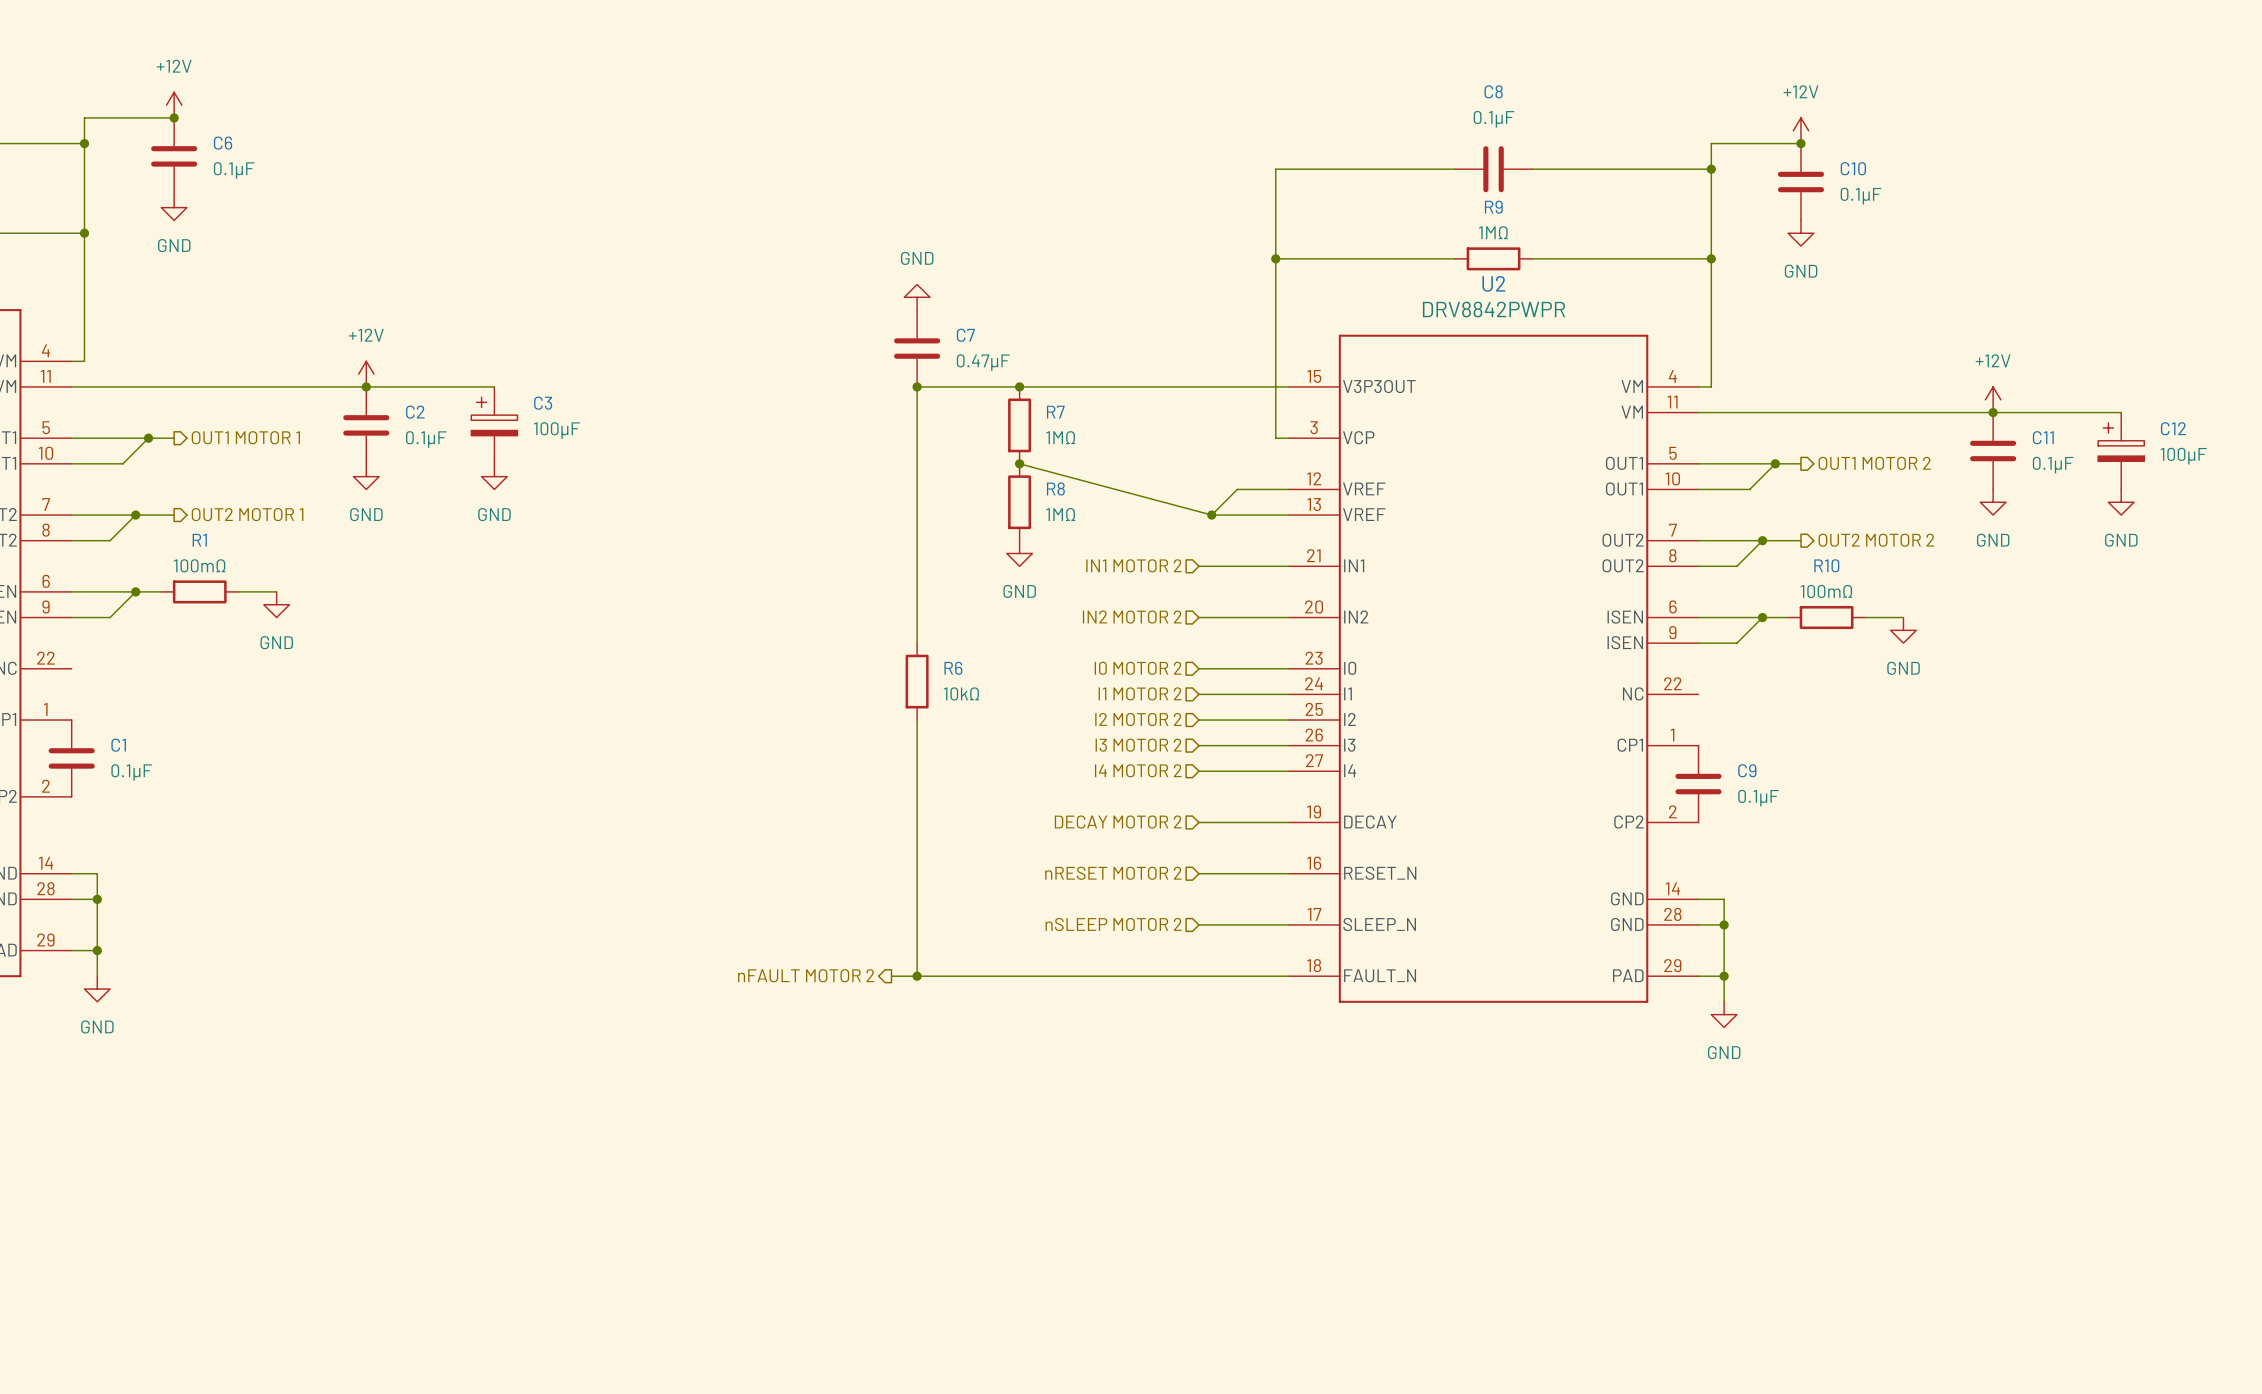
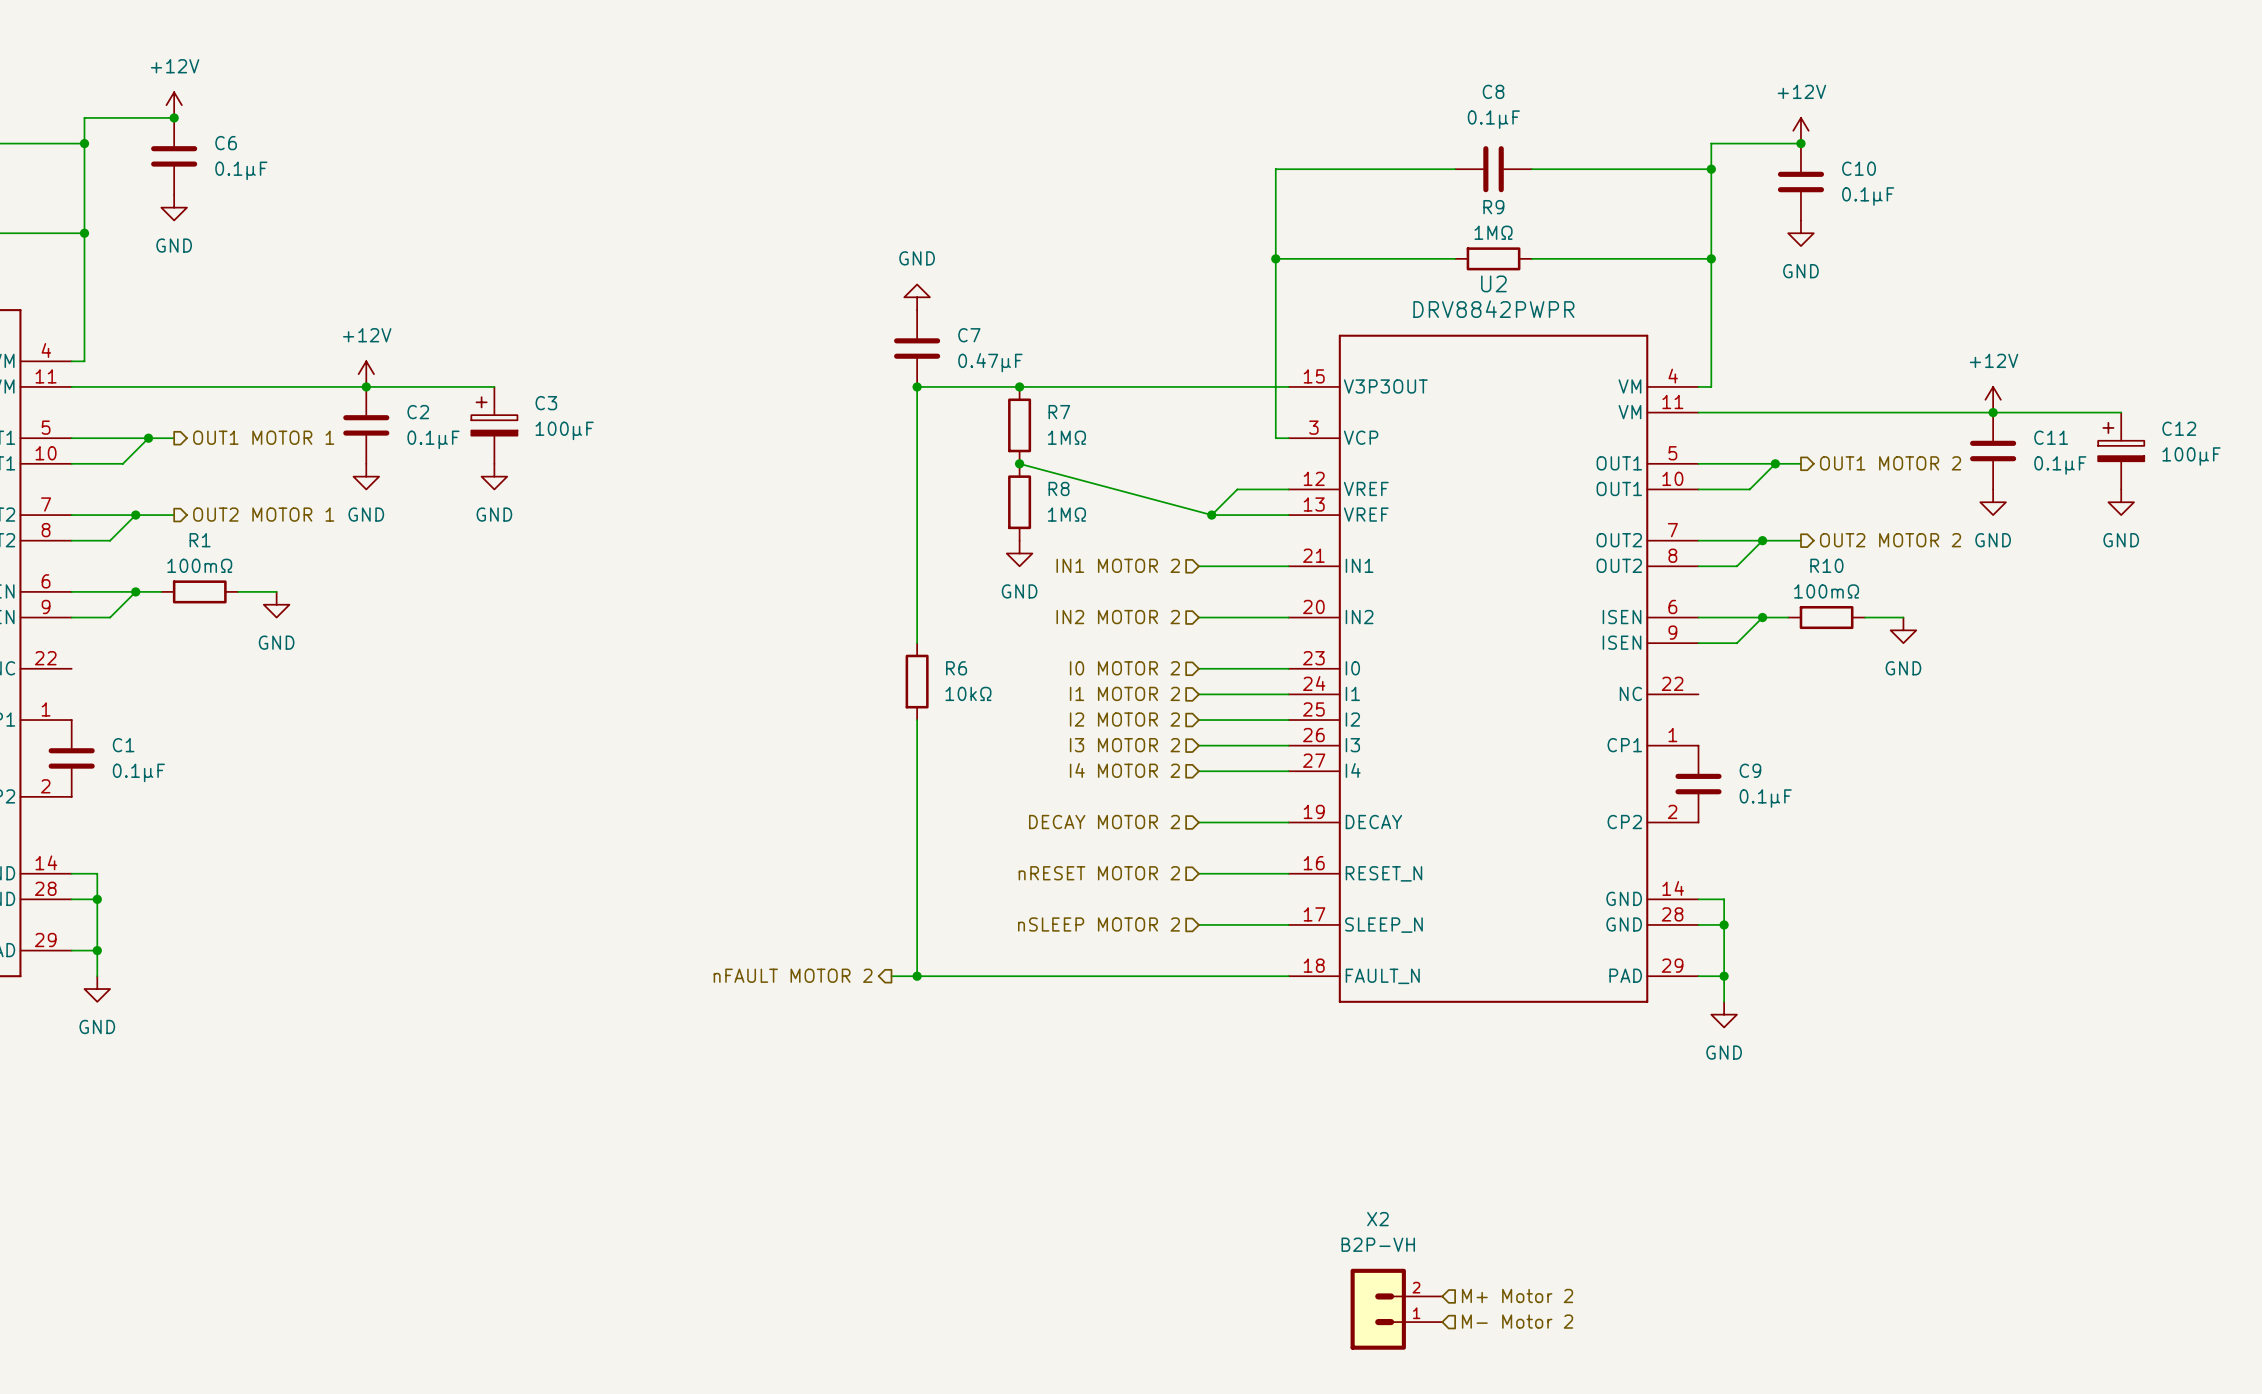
hierarchical label: none -> M+ Motor 2 (1517, 1295)
X2: none -> B2P-VH (1396, 1309)
hierarchical label: none -> M- Motor 2 (1517, 1321)

